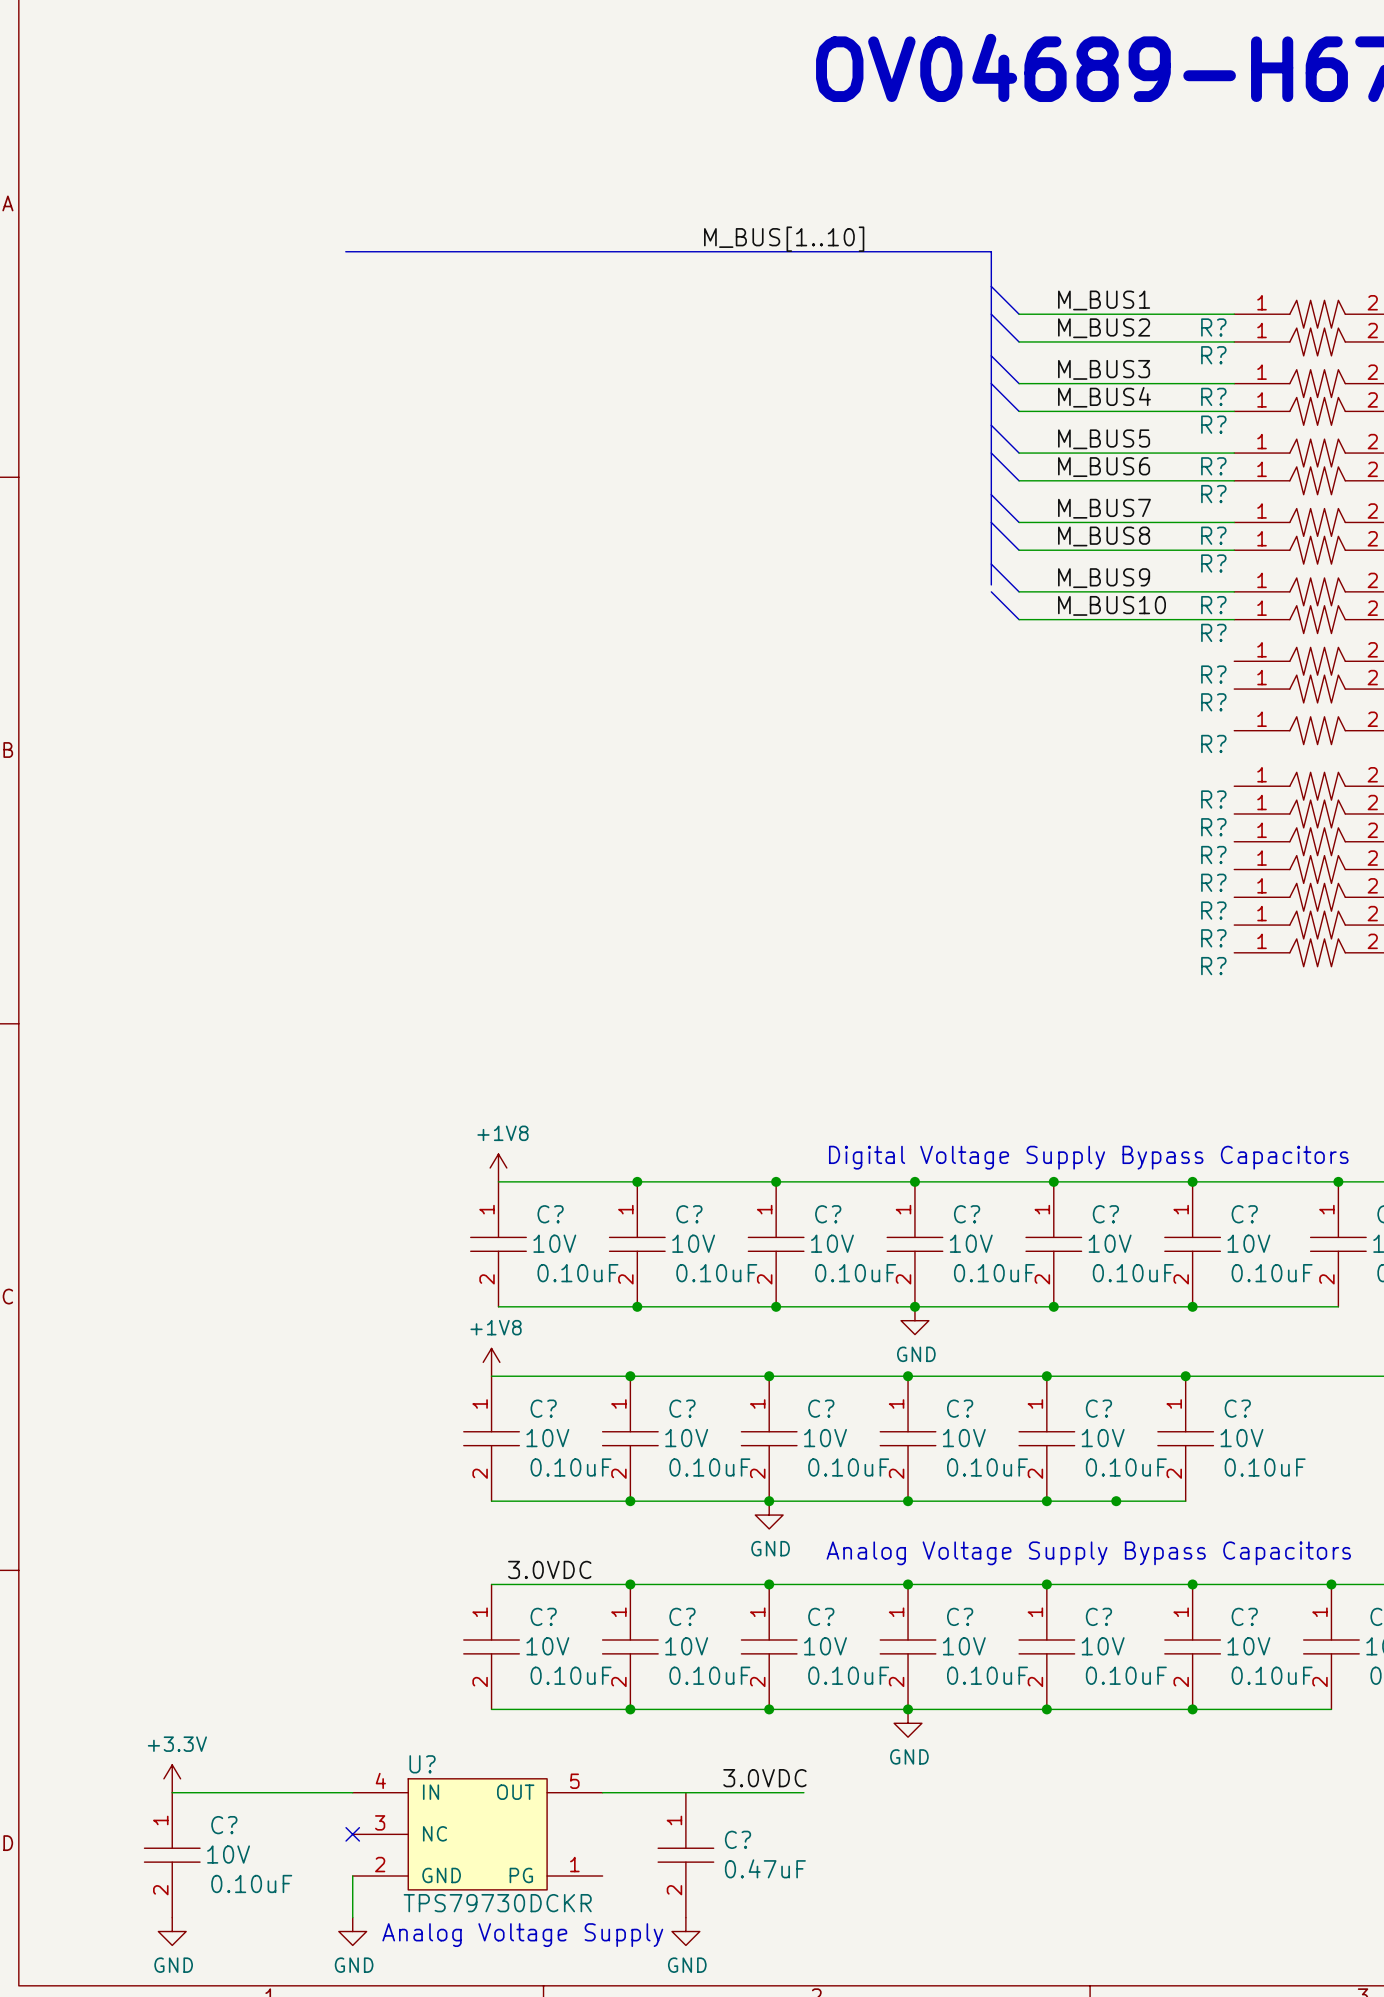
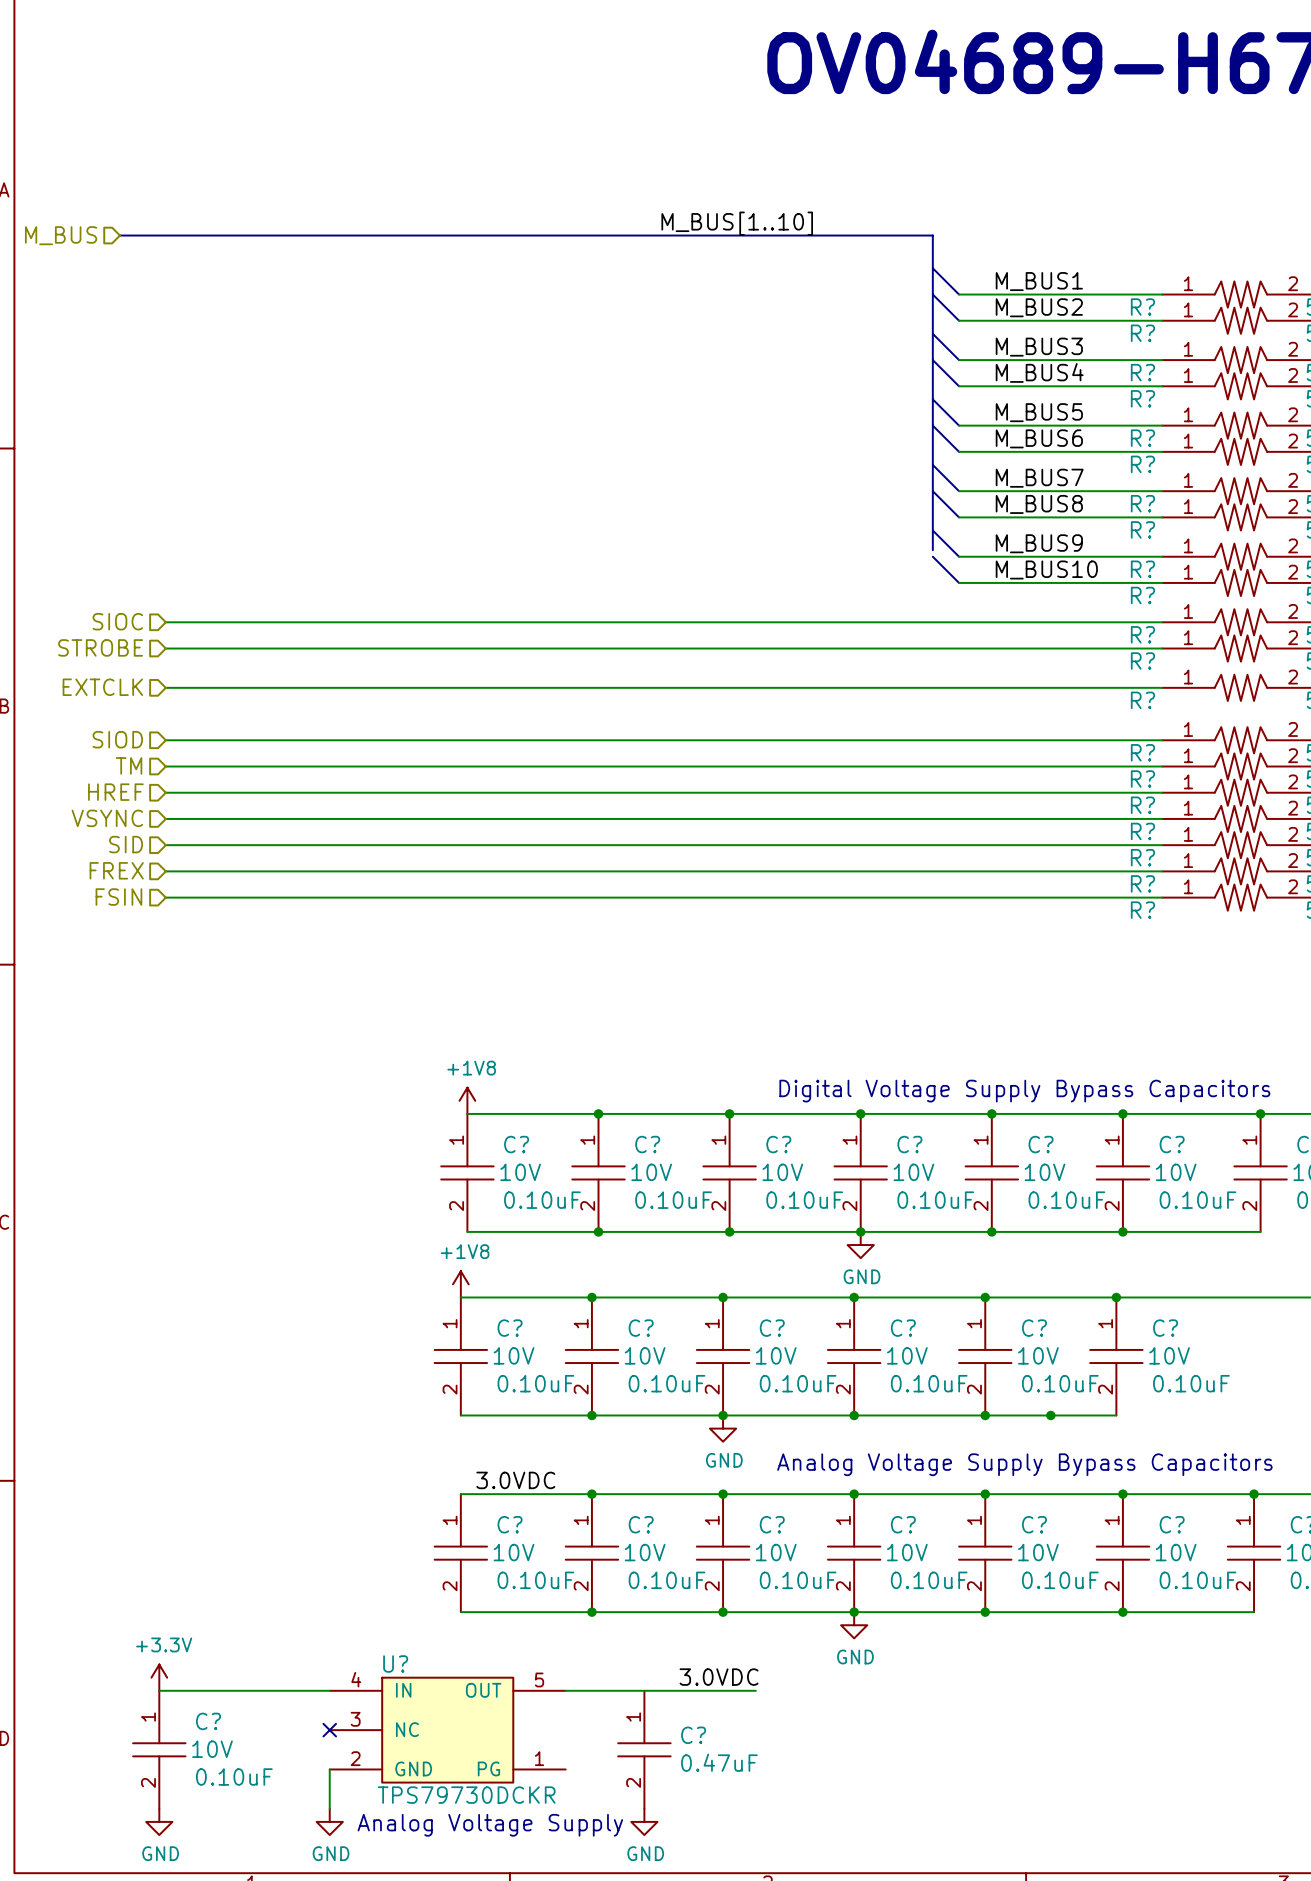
hierarchical label: none -> M_BUS (61, 235)
bus: none -> (119, 235) (323, 235)
hierarchical label: none -> SIOC (117, 621)
wire: none -> (165, 622) (1162, 622)
hierarchical label: none -> STROBE (100, 647)
wire: none -> (165, 648) (1162, 648)
hierarchical label: none -> EXTCLK (102, 687)
wire: none -> (165, 687) (1162, 687)
hierarchical label: none -> SIOD (117, 739)
wire: none -> (165, 740) (1162, 740)
hierarchical label: none -> TM (129, 765)
wire: none -> (165, 766) (1162, 766)
hierarchical label: none -> HREF (115, 792)
wire: none -> (165, 792) (1162, 792)
hierarchical label: none -> VSYNC (107, 818)
wire: none -> (165, 818) (1162, 818)
hierarchical label: none -> SID (126, 844)
wire: none -> (165, 845) (1162, 845)
hierarchical label: none -> FREX (116, 870)
wire: none -> (165, 871) (1162, 871)
hierarchical label: none -> FSIN (118, 897)
wire: none -> (165, 897) (1162, 897)

